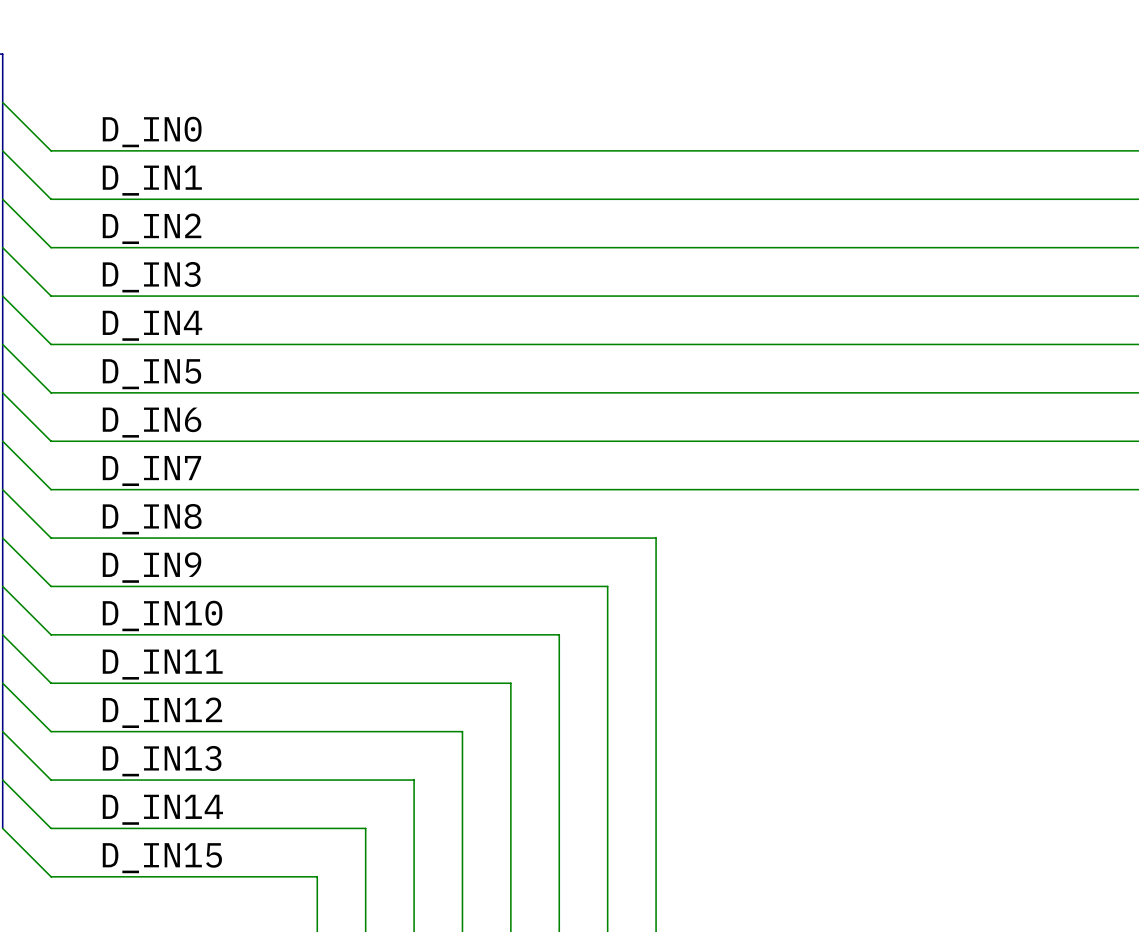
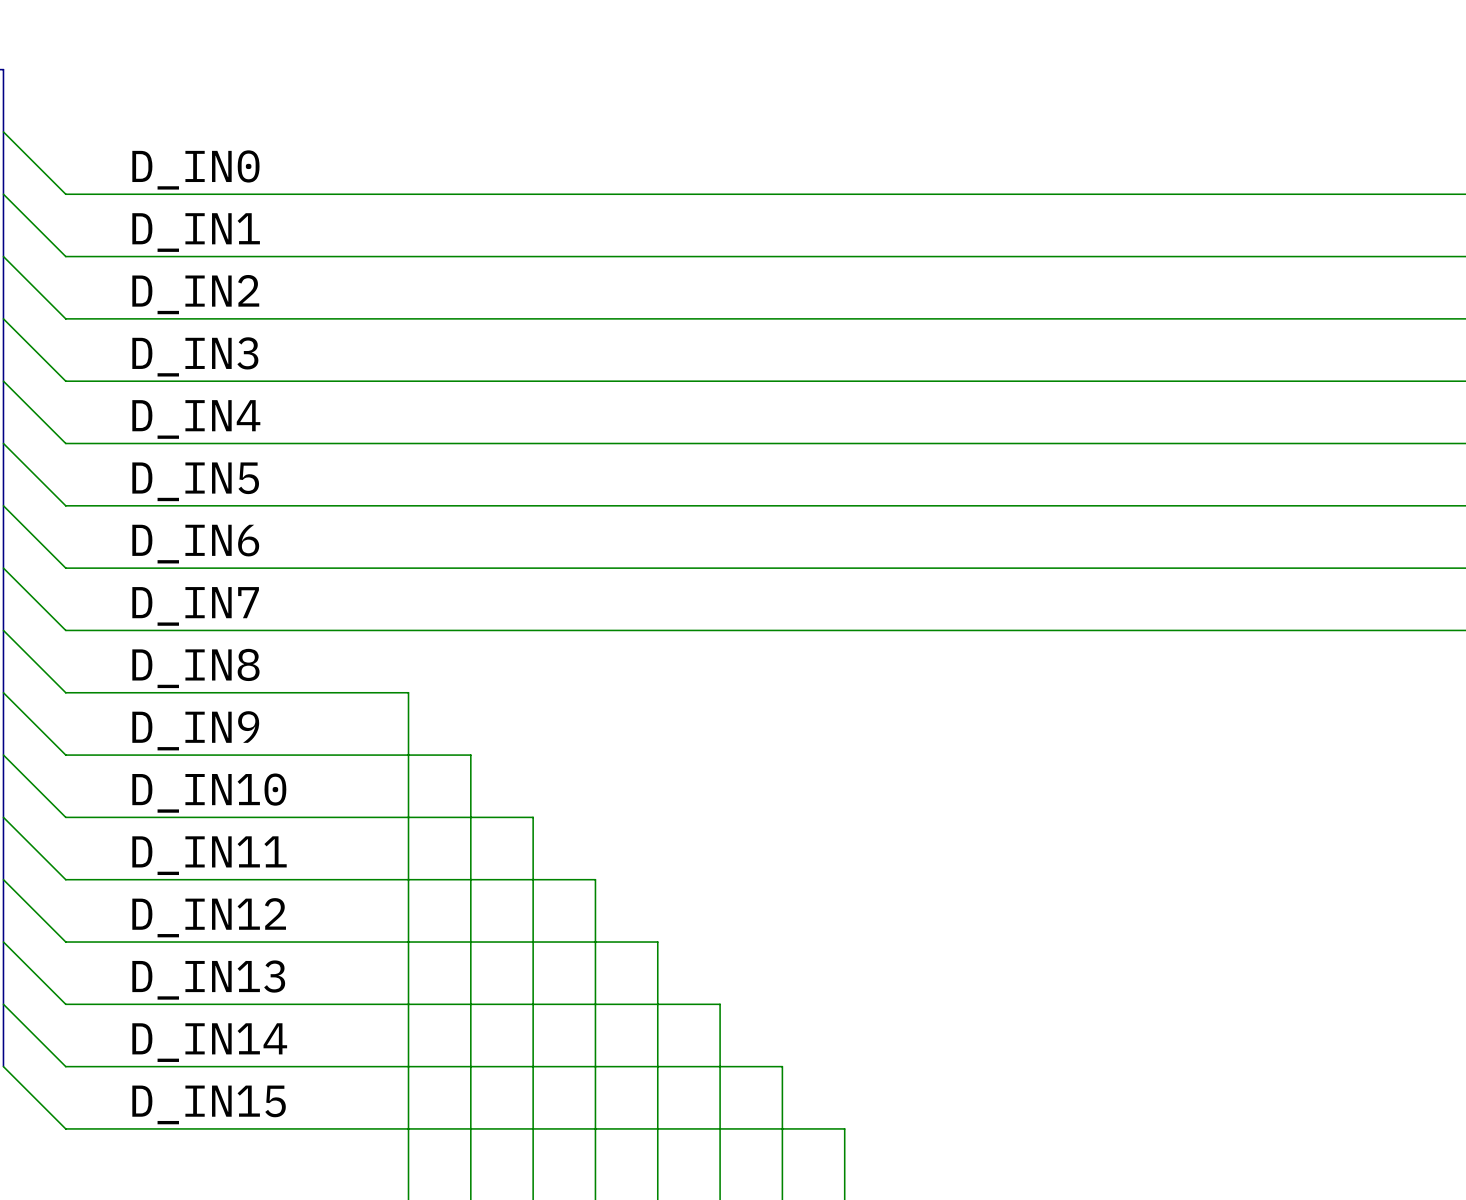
wire: (317, 538) (656, 538) (656, 876) -> (408, 692) (408, 1128) (844, 1128)
wire: (365, 586) (607, 586) (607, 828) -> (470, 755) (470, 1066) (782, 1066)
wire: (414, 634) (559, 634) (559, 780) -> (533, 817) (533, 1004) (720, 1004)
wire: (462, 683) (510, 683) (510, 731) -> (595, 879) (595, 942) (657, 942)

